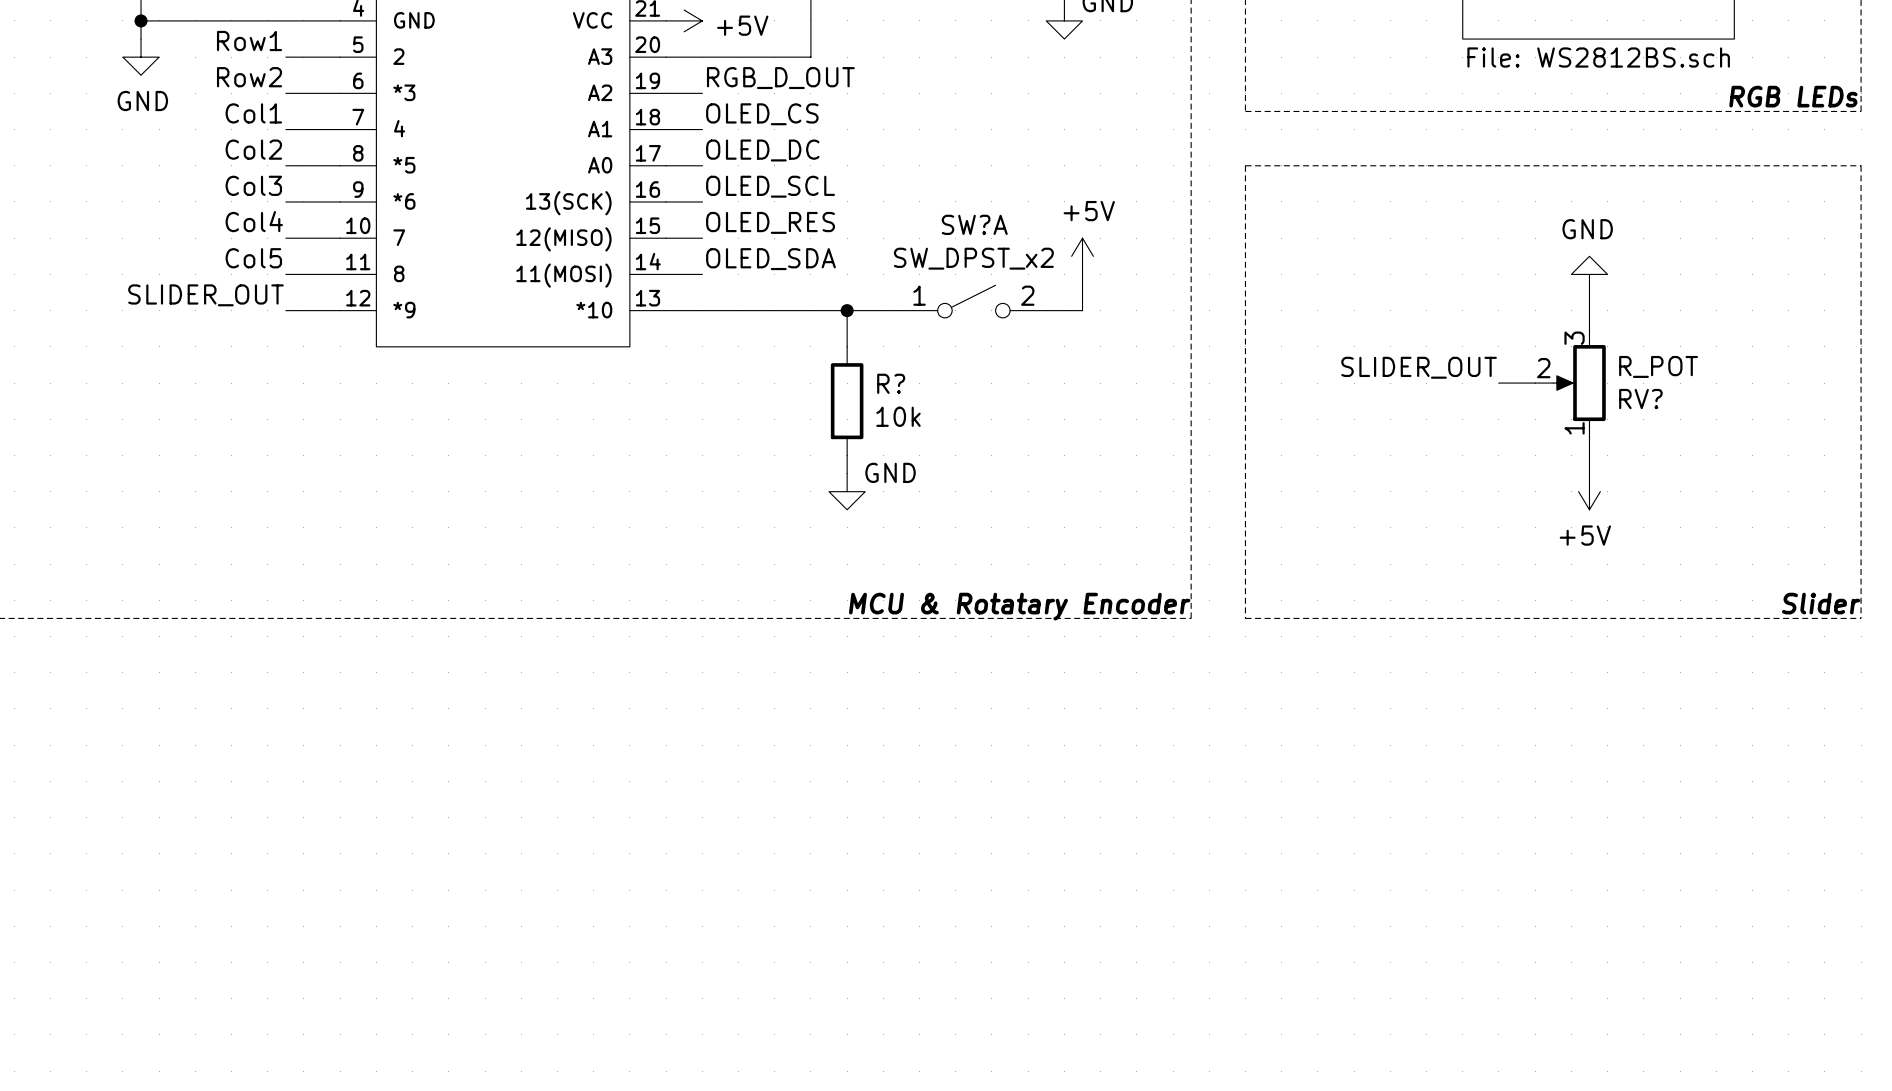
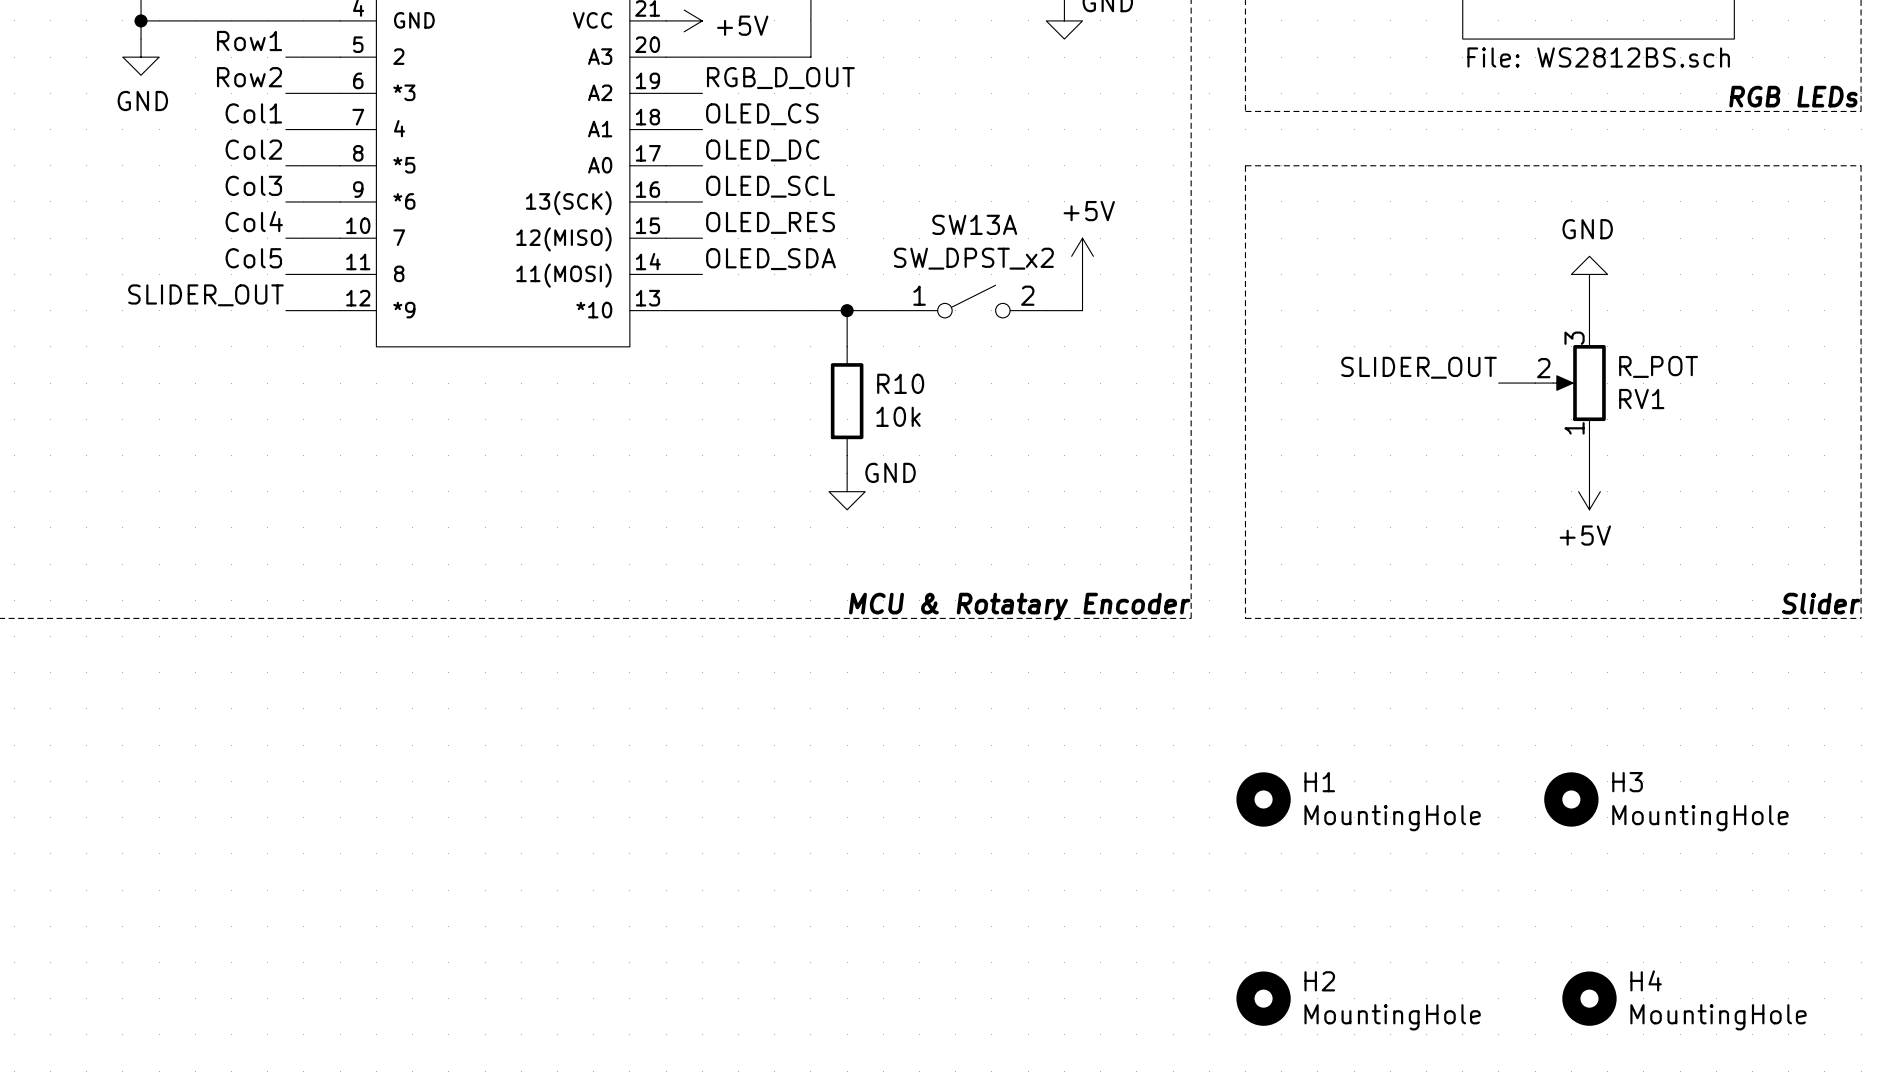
SW?A name: SW?A (974, 224) -> SW13A (974, 224)
R? name: R? (891, 383) -> R10 (900, 383)
RV? name: RV? (1640, 399) -> RV1 (1641, 399)
H1: none -> MountingHole (1263, 799)
H3: none -> MountingHole (1571, 799)
H2: none -> MountingHole (1263, 998)
H4: none -> MountingHole (1589, 998)

